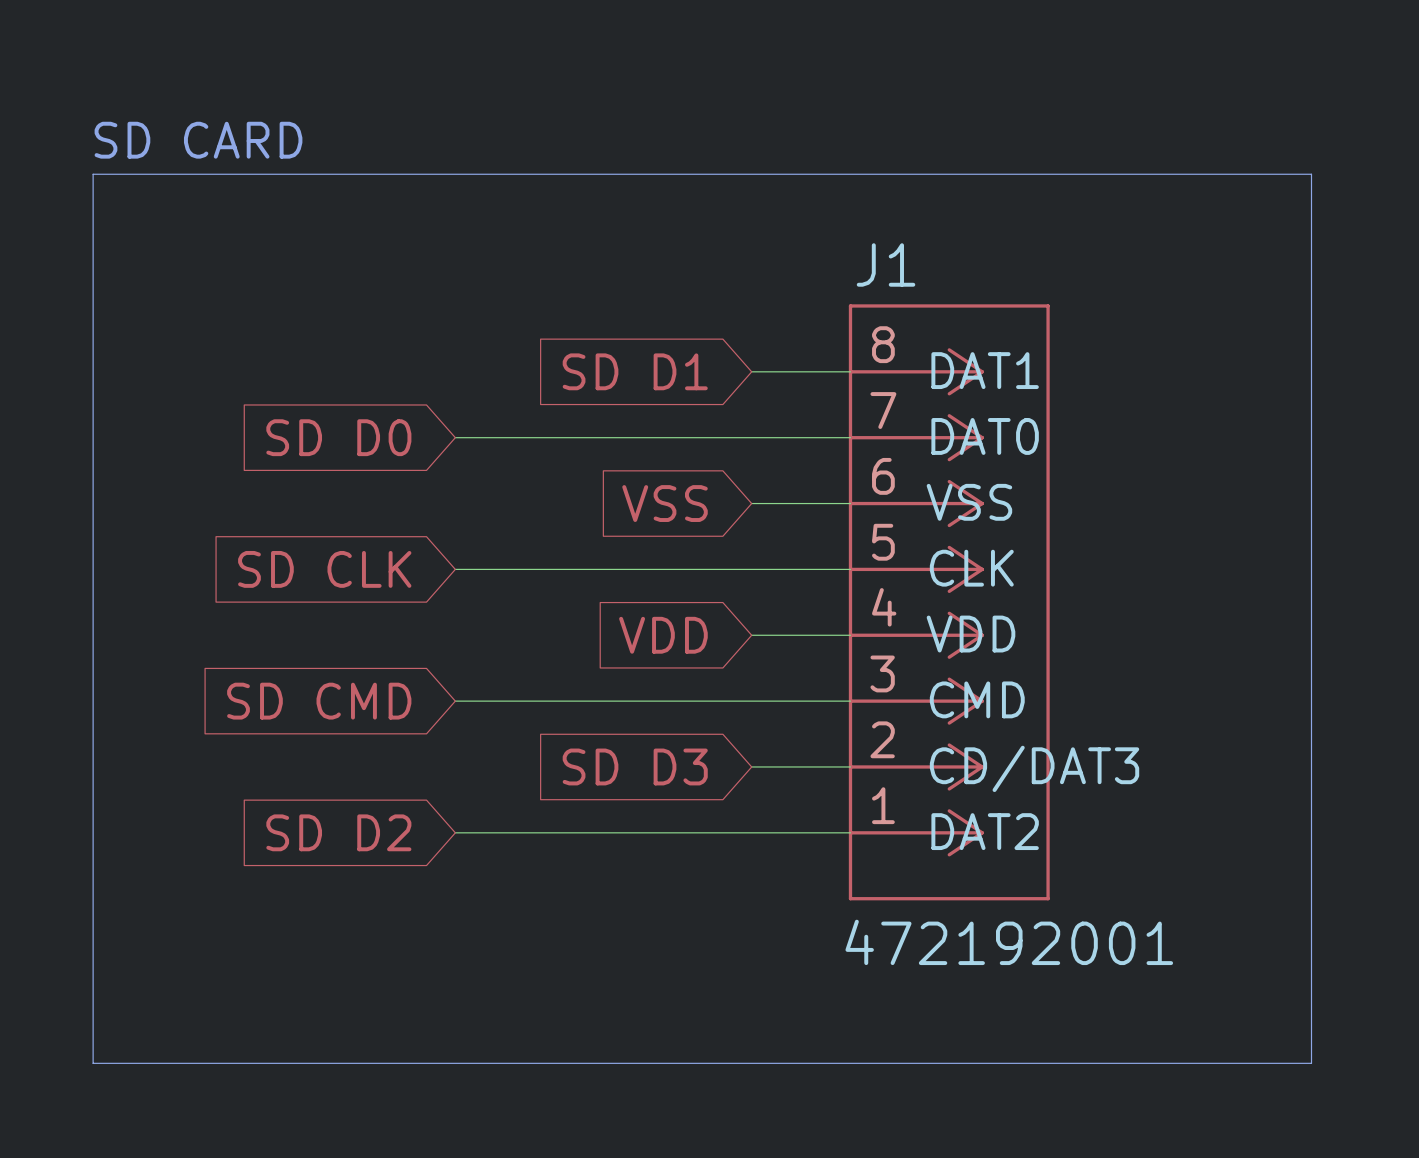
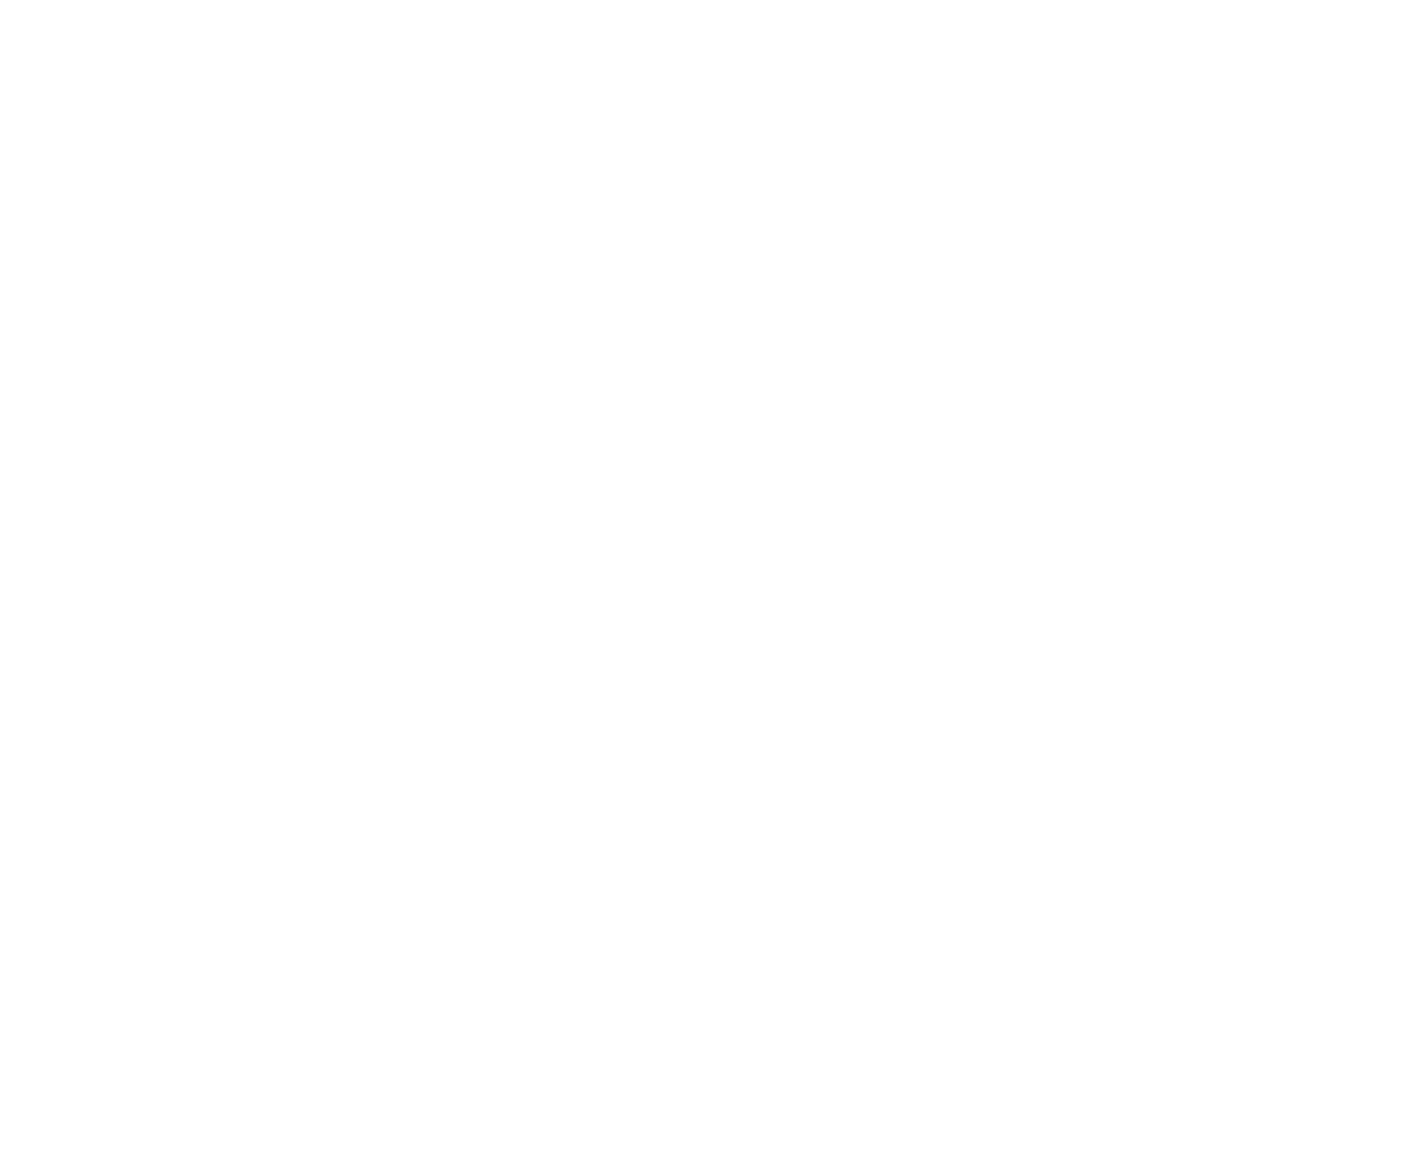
text: SD CARD (198, 140) -> none
line: (93, 174) (1311, 174) (1311, 1063) (93, 1063) (93, 174) -> none
global label: SD D1 (635, 371) -> none
wire: (751, 371) (850, 371) -> none
global label: SD D0 (338, 437) -> none
wire: (455, 437) (850, 437) -> none
global label: VSS (665, 503) -> none
wire: (751, 503) (850, 503) -> none
global label: SD CLK (324, 569) -> none
wire: (455, 569) (850, 569) -> none
J1: 472192001 (949, 602) -> none
global label: VDD (663, 635) -> none
wire: (751, 635) (850, 635) -> none
global label: SD CMD (319, 701) -> none
wire: (455, 701) (850, 701) -> none
global label: SD D3 (635, 766) -> none
wire: (751, 766) (850, 766) -> none
global label: SD D2 (338, 832) -> none
wire: (455, 832) (850, 832) -> none

